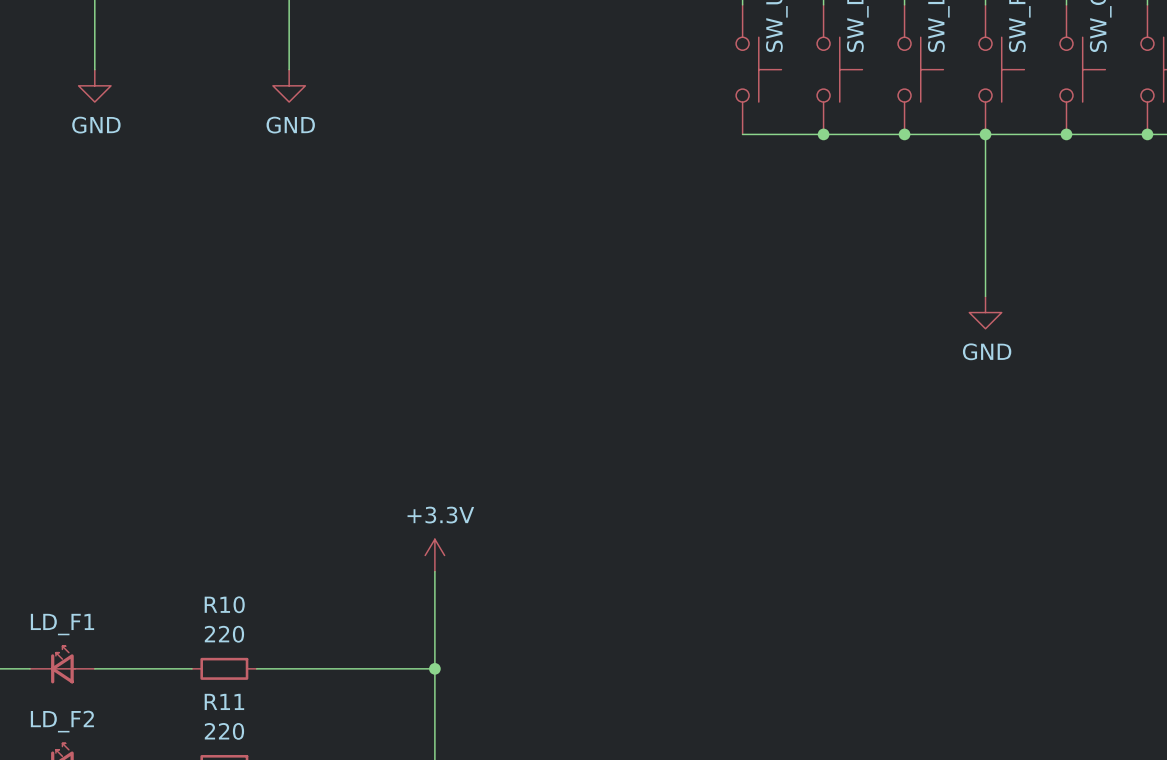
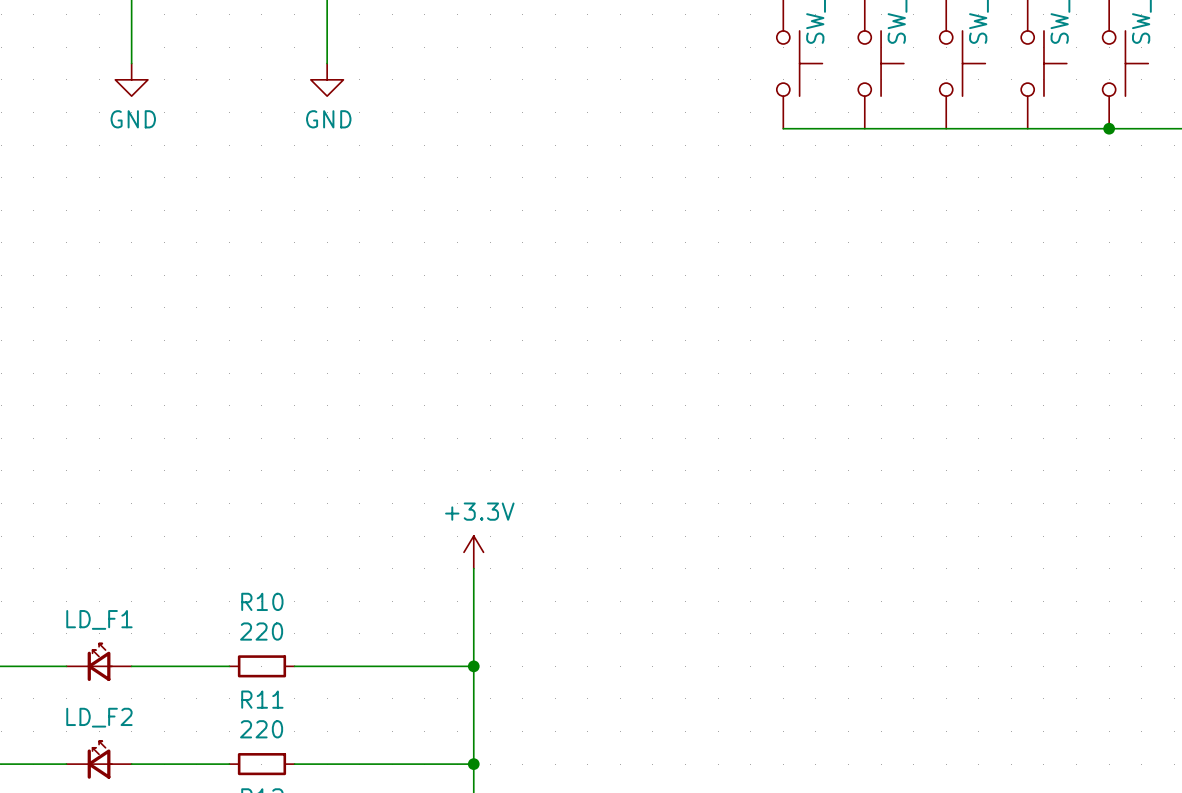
junction: (823, 134) -> none
junction: (904, 134) -> none
wire: (985, 134) (985, 296) -> none
junction: (985, 134) -> none
power symbol: GND (985, 312) -> none

